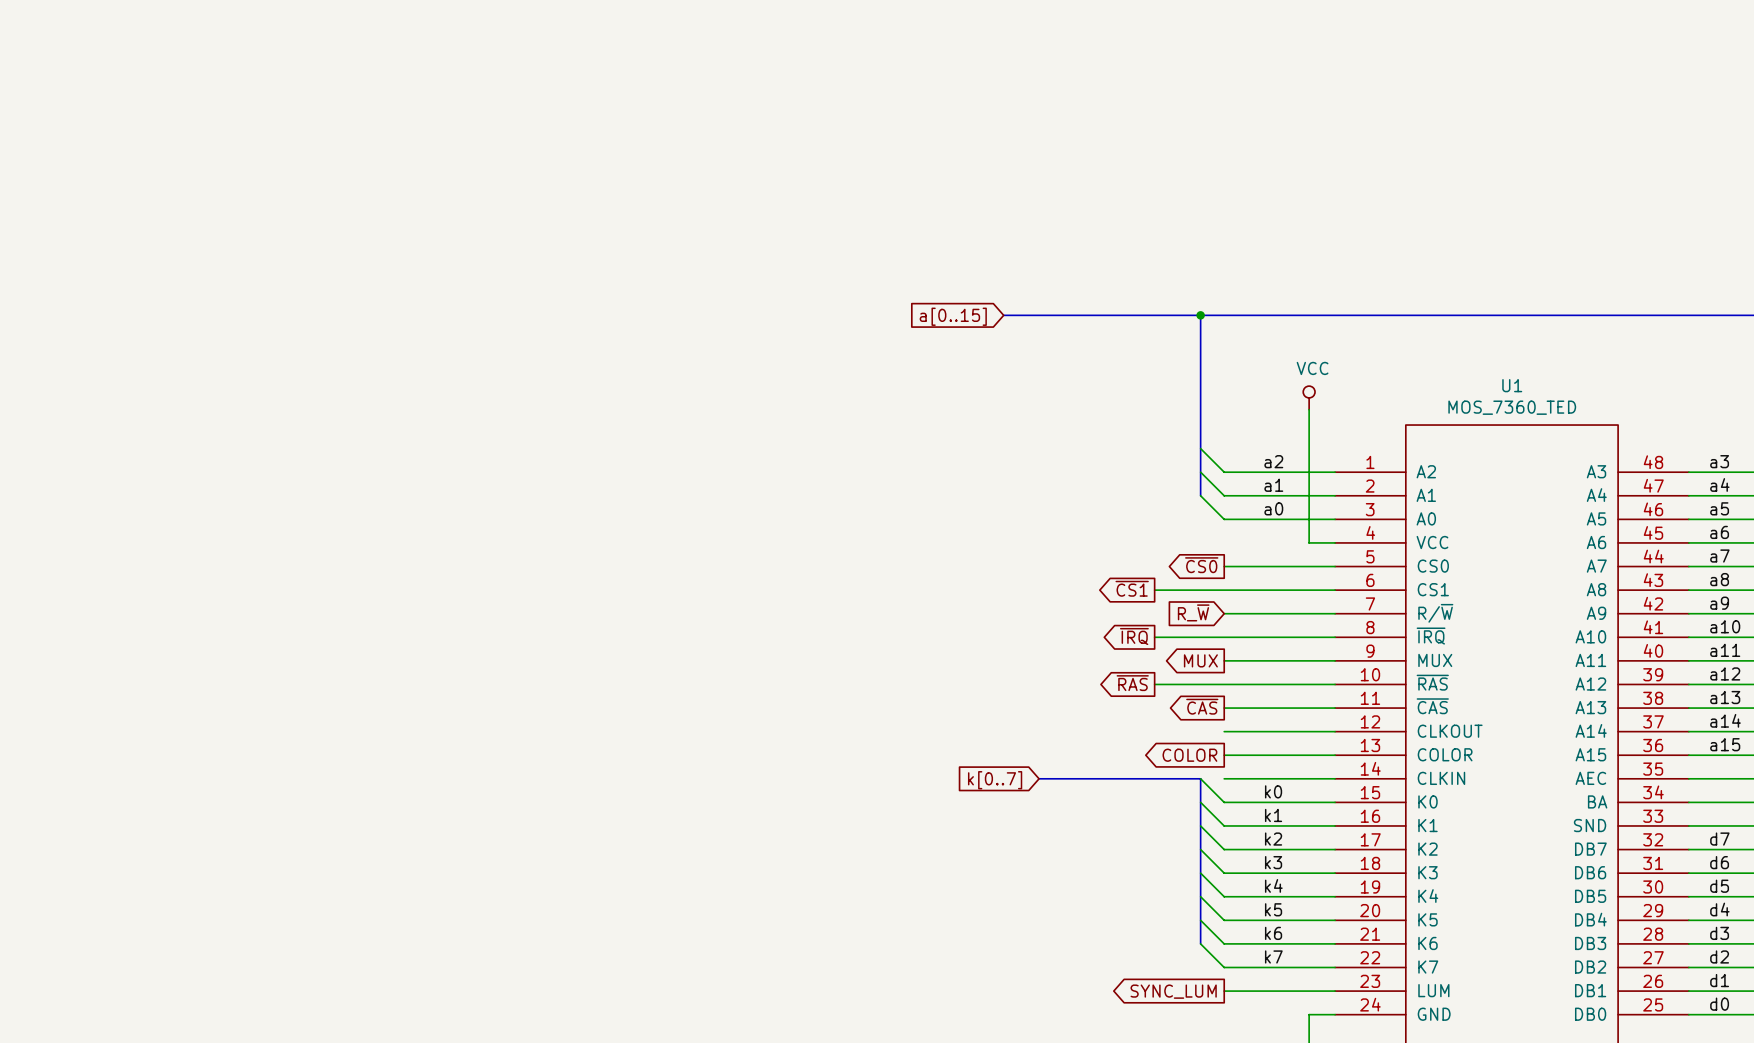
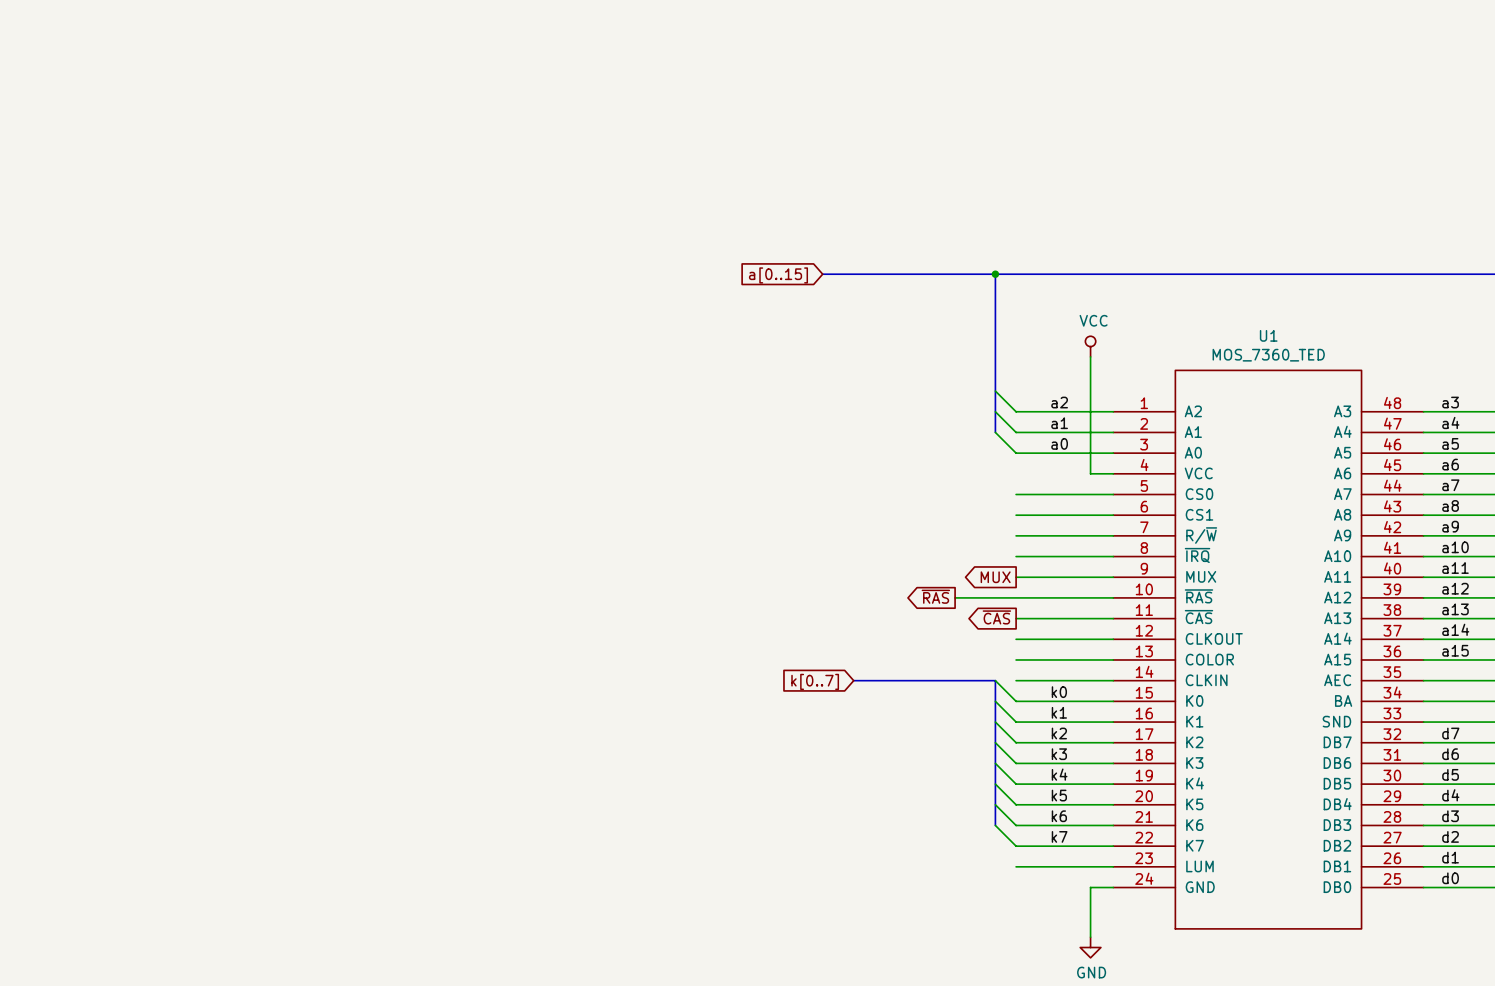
global label: ~{CS0} (1201, 565) -> none
global label: ~{CS1} (1132, 588) -> none
wire: (1154, 590) (1224, 590) -> none
global label: R_~{W} (1193, 612) -> none
global label: ~{IRQ} (1134, 636) -> none
wire: (1154, 637) (1224, 637) -> none
global label: COLOR (1189, 755) -> none
global label: SYNC_LUM (1173, 991) -> none

